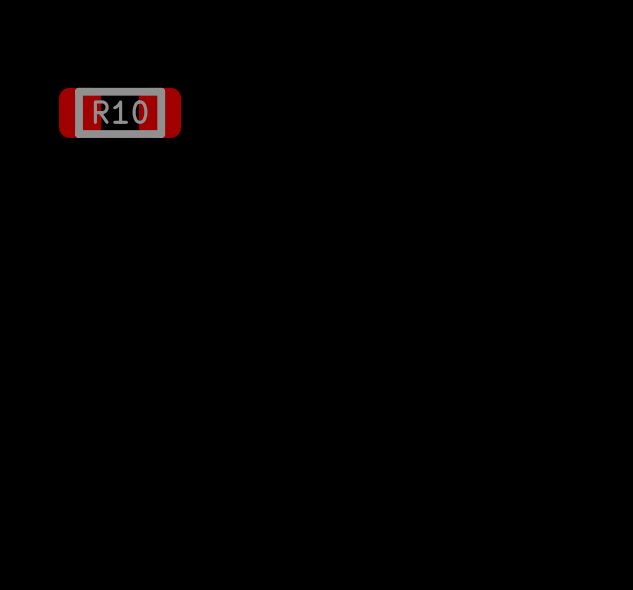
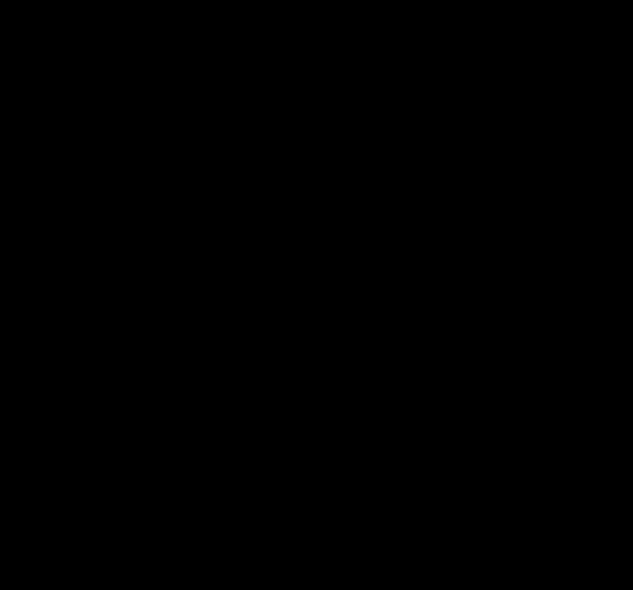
R10: (120, 112) -> none

